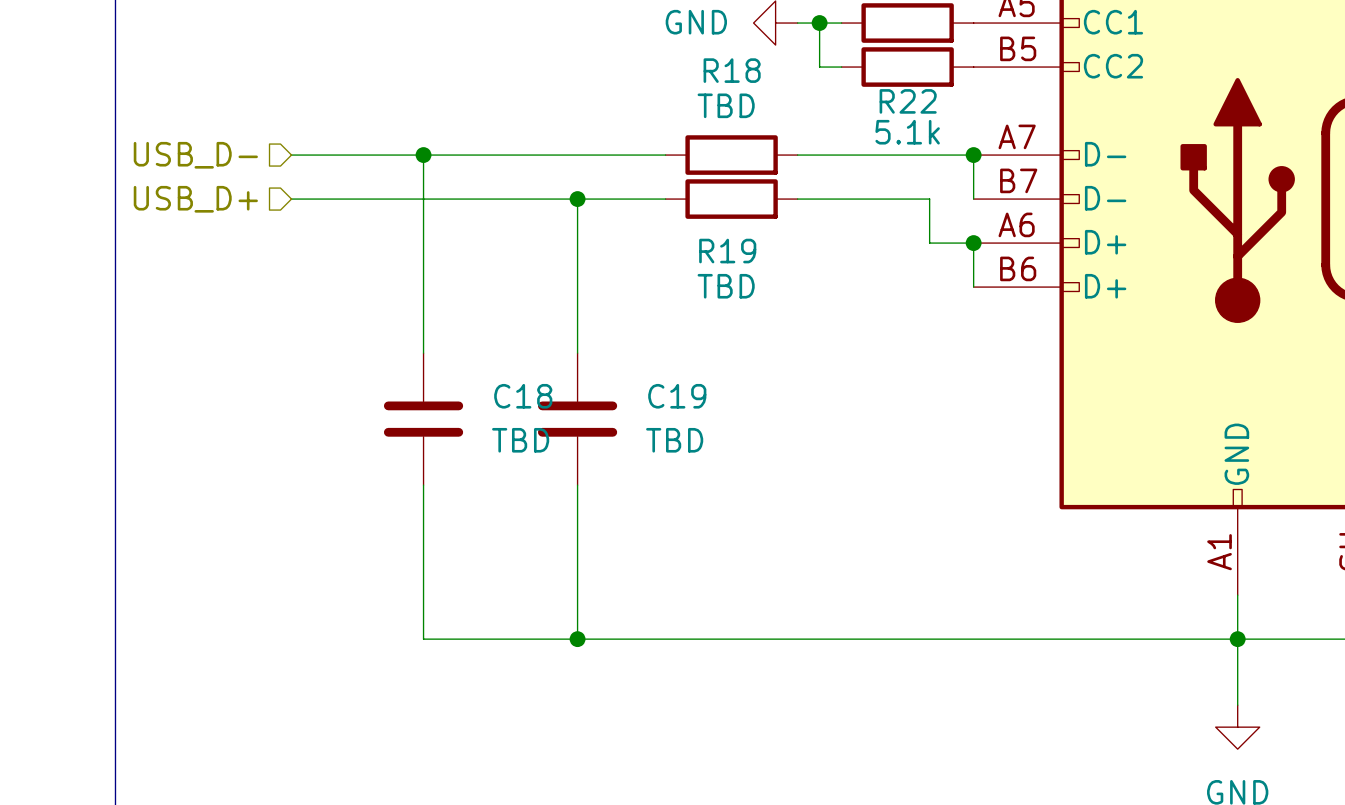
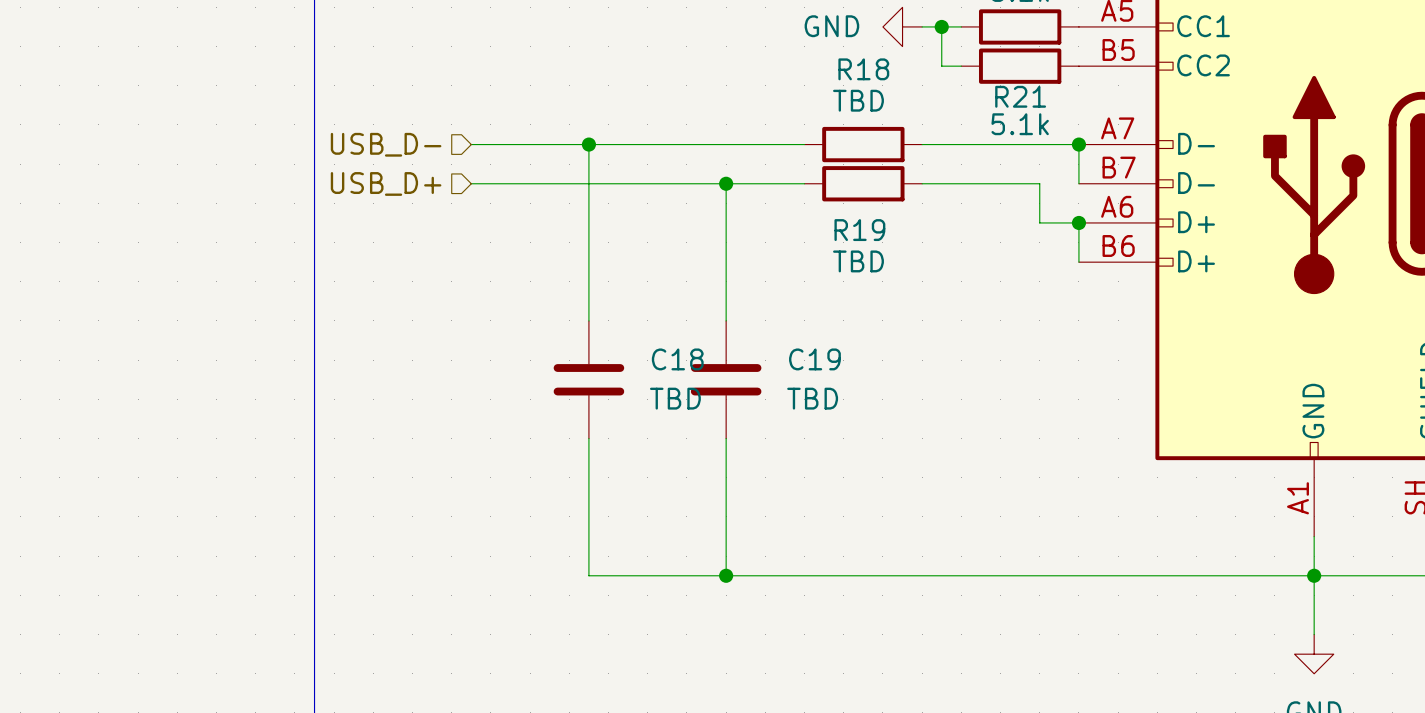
R22 name: R22 (908, 101) -> R21 (1020, 96)

